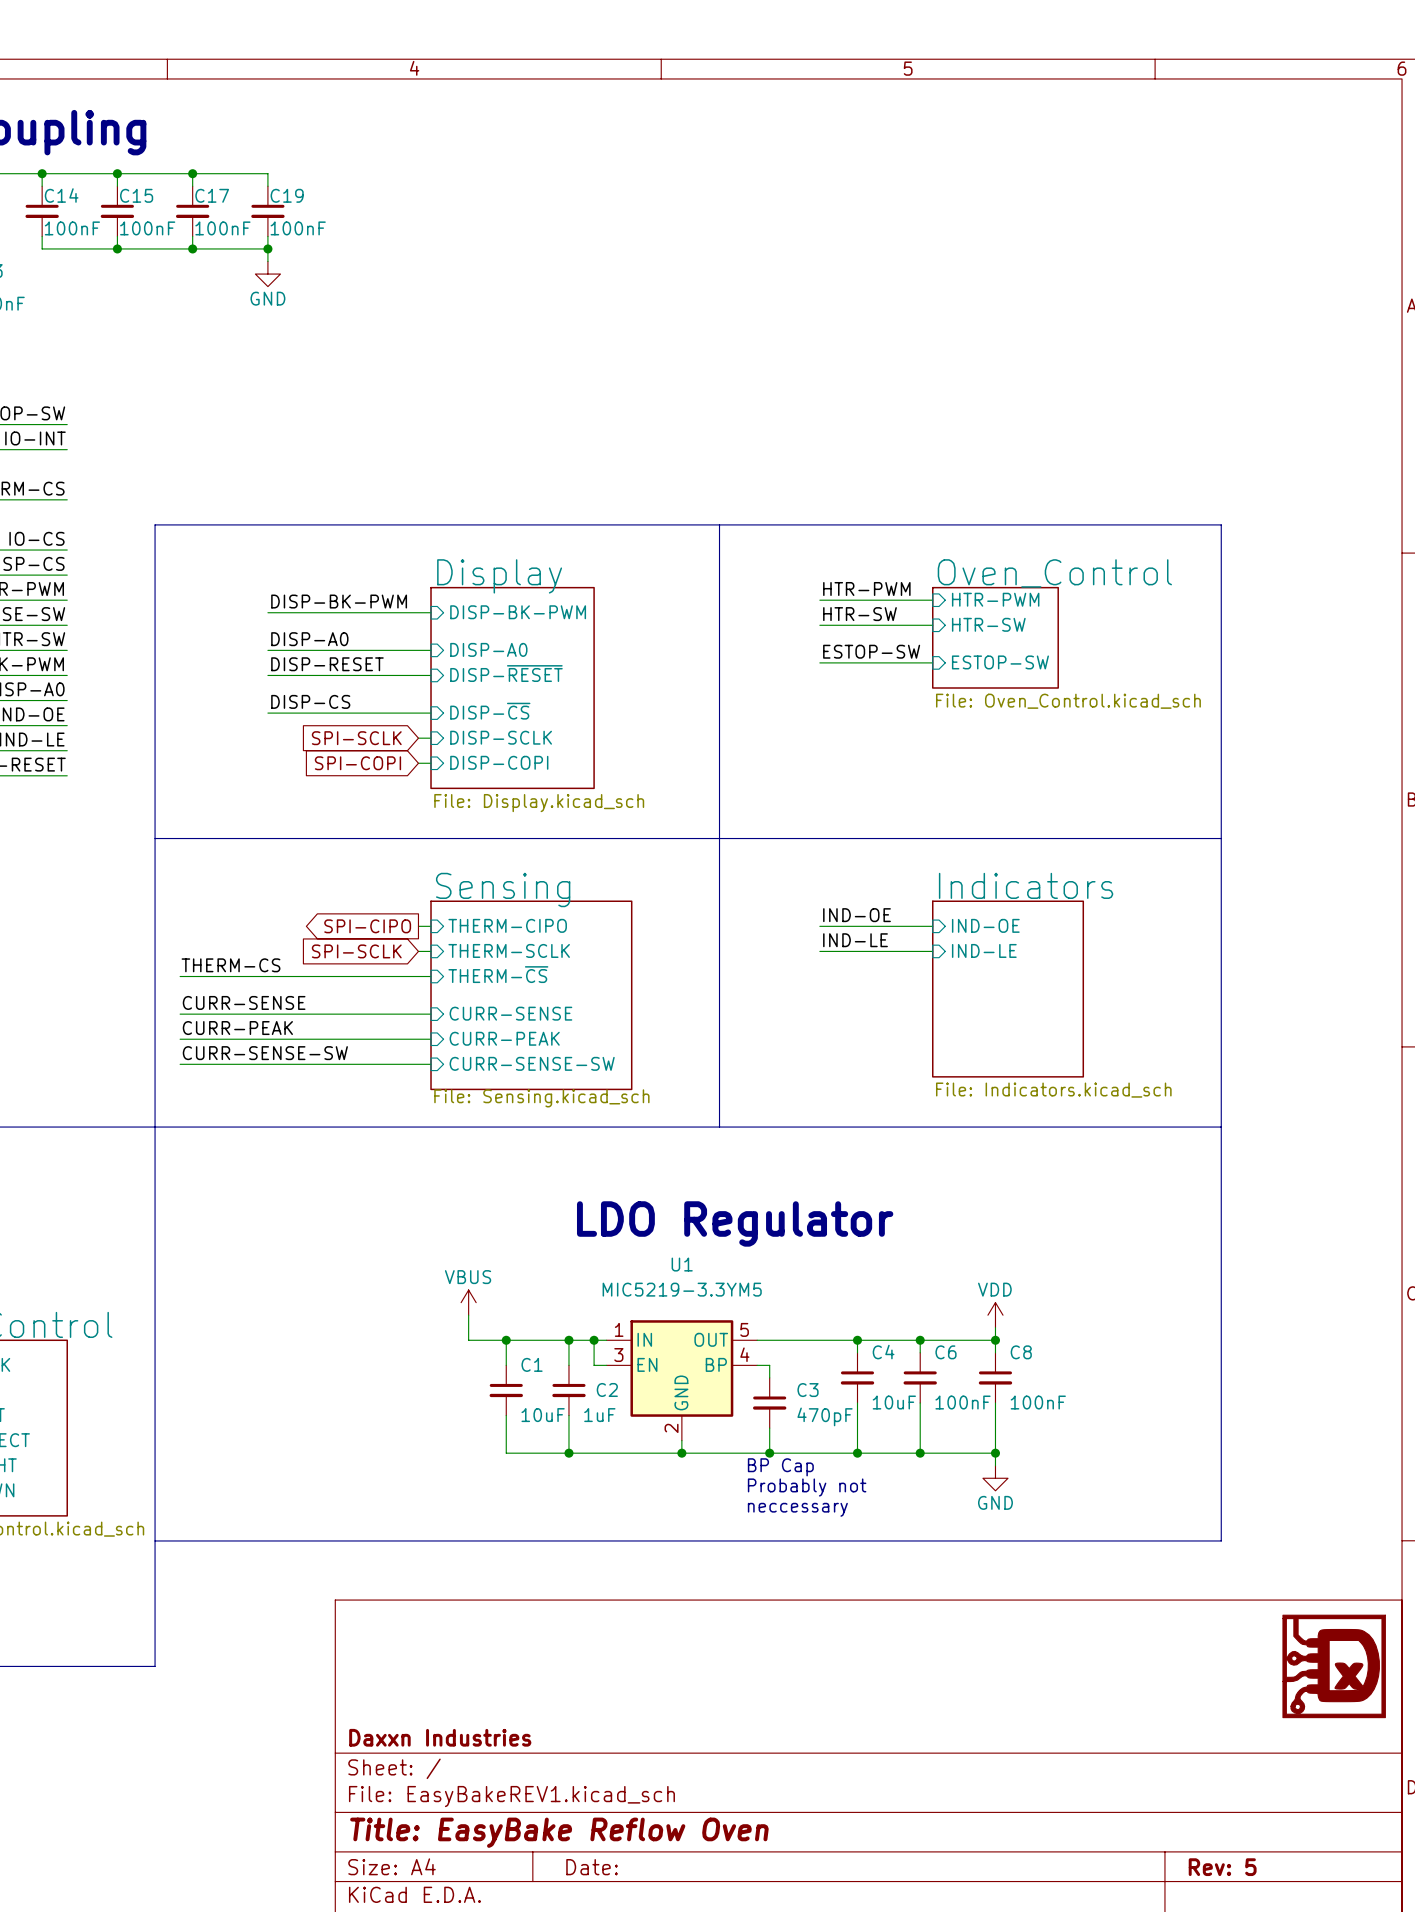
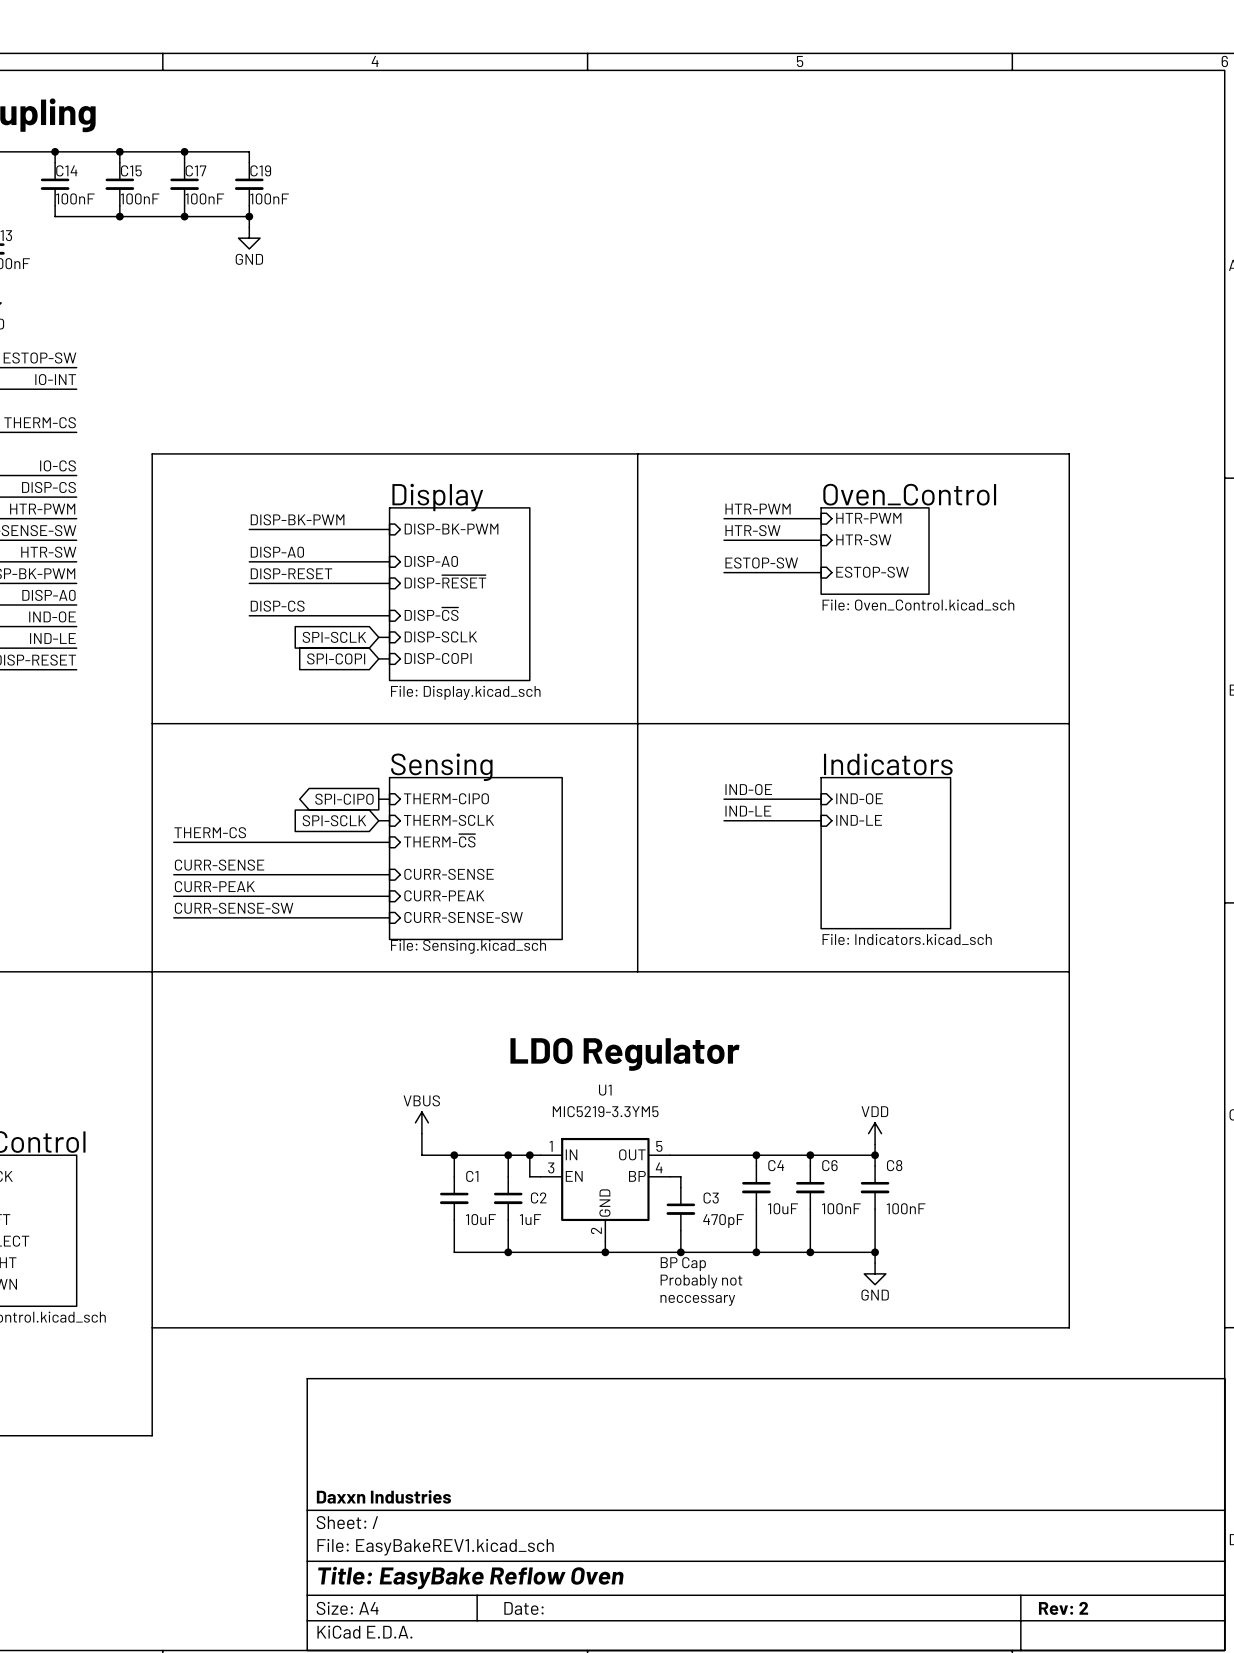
power symbol: (1334, 1666) -> none
title block: Rev: 5 (1222, 1867) -> Rev: 2 (1063, 1608)

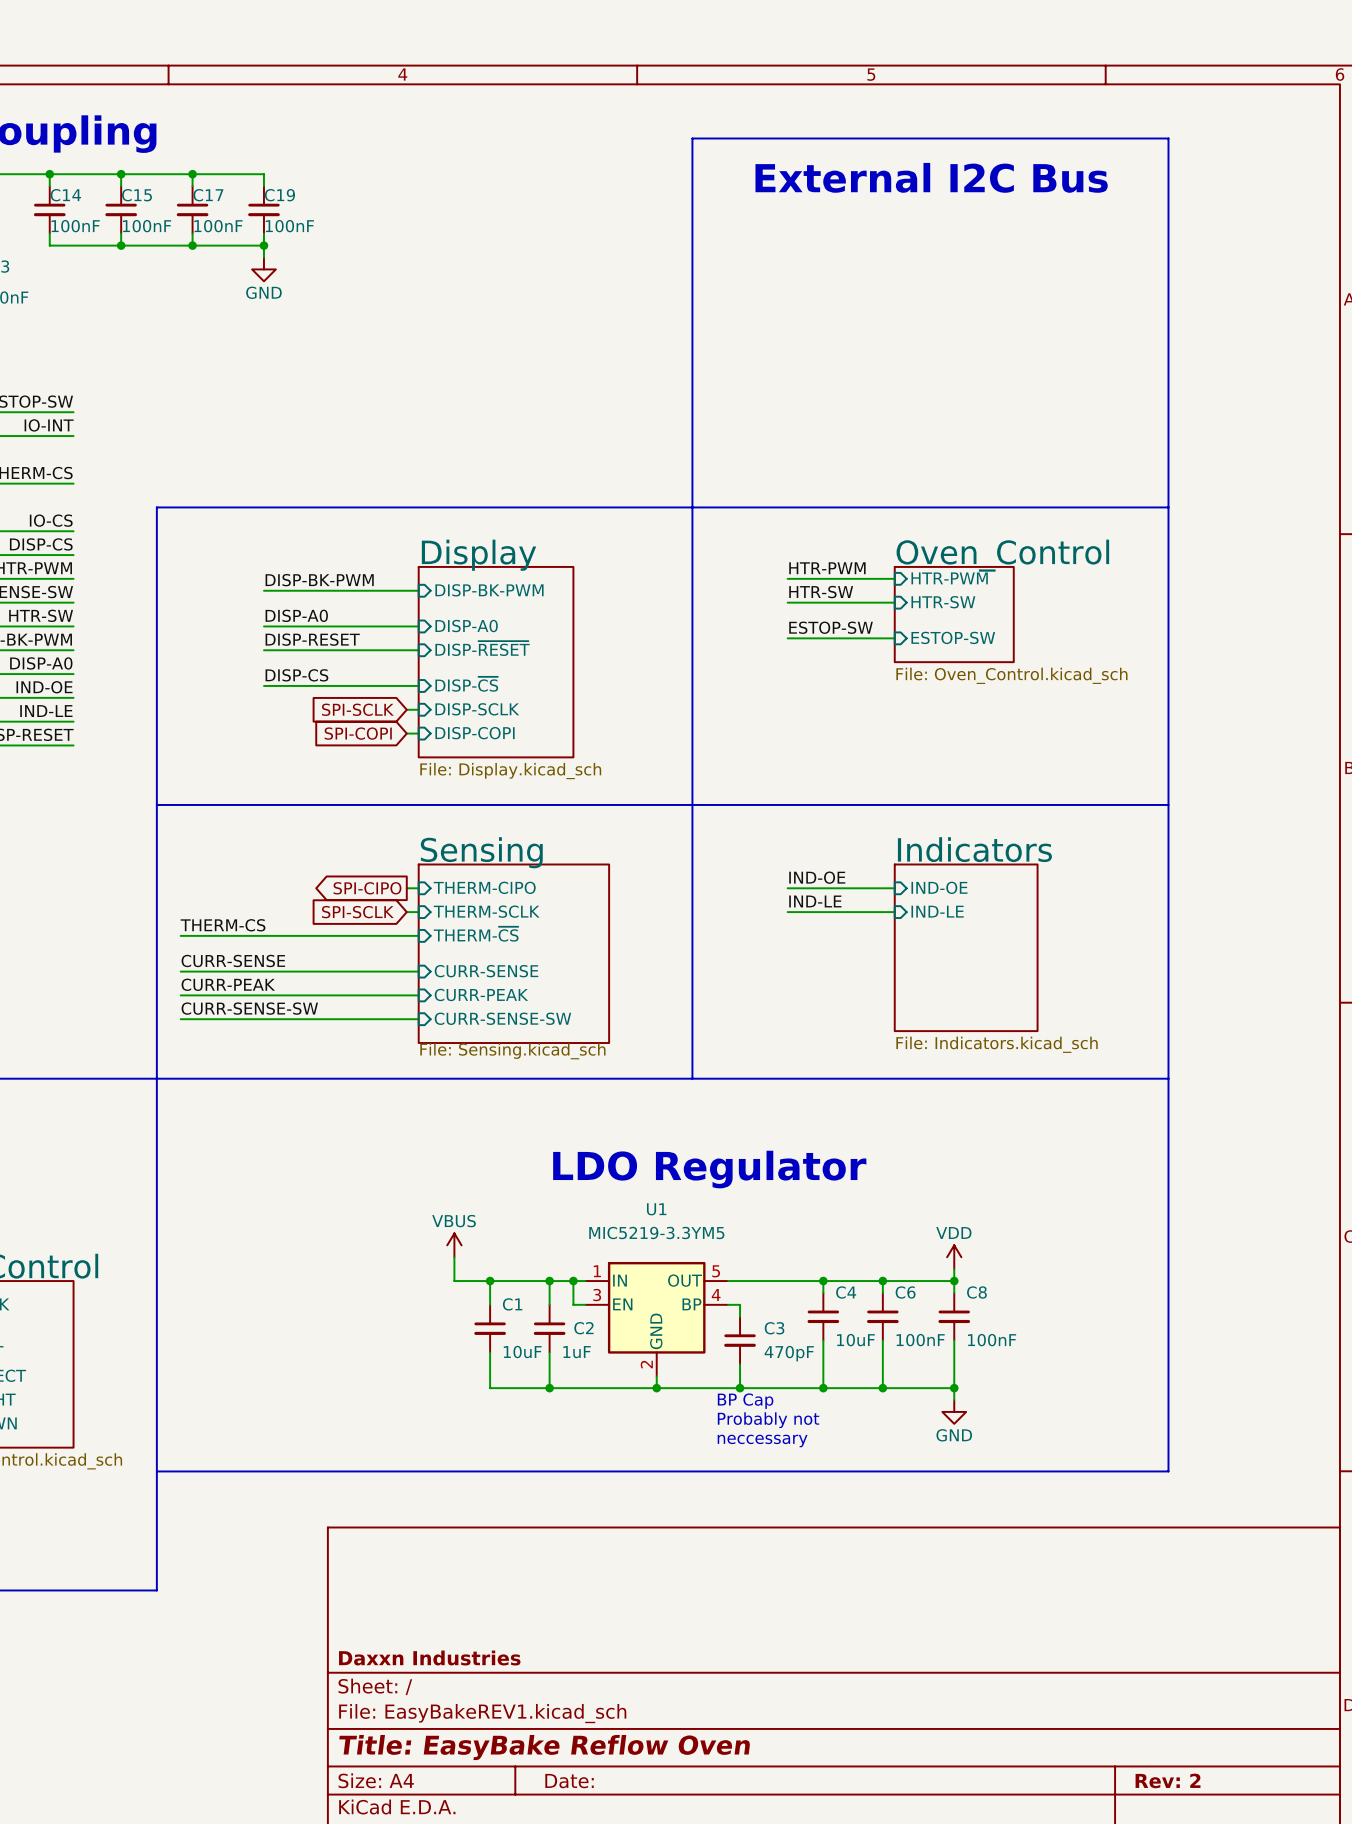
text: none -> External I2C Bus (931, 177)
line: none -> (692, 507) (692, 138) (1168, 138) (1168, 507)

